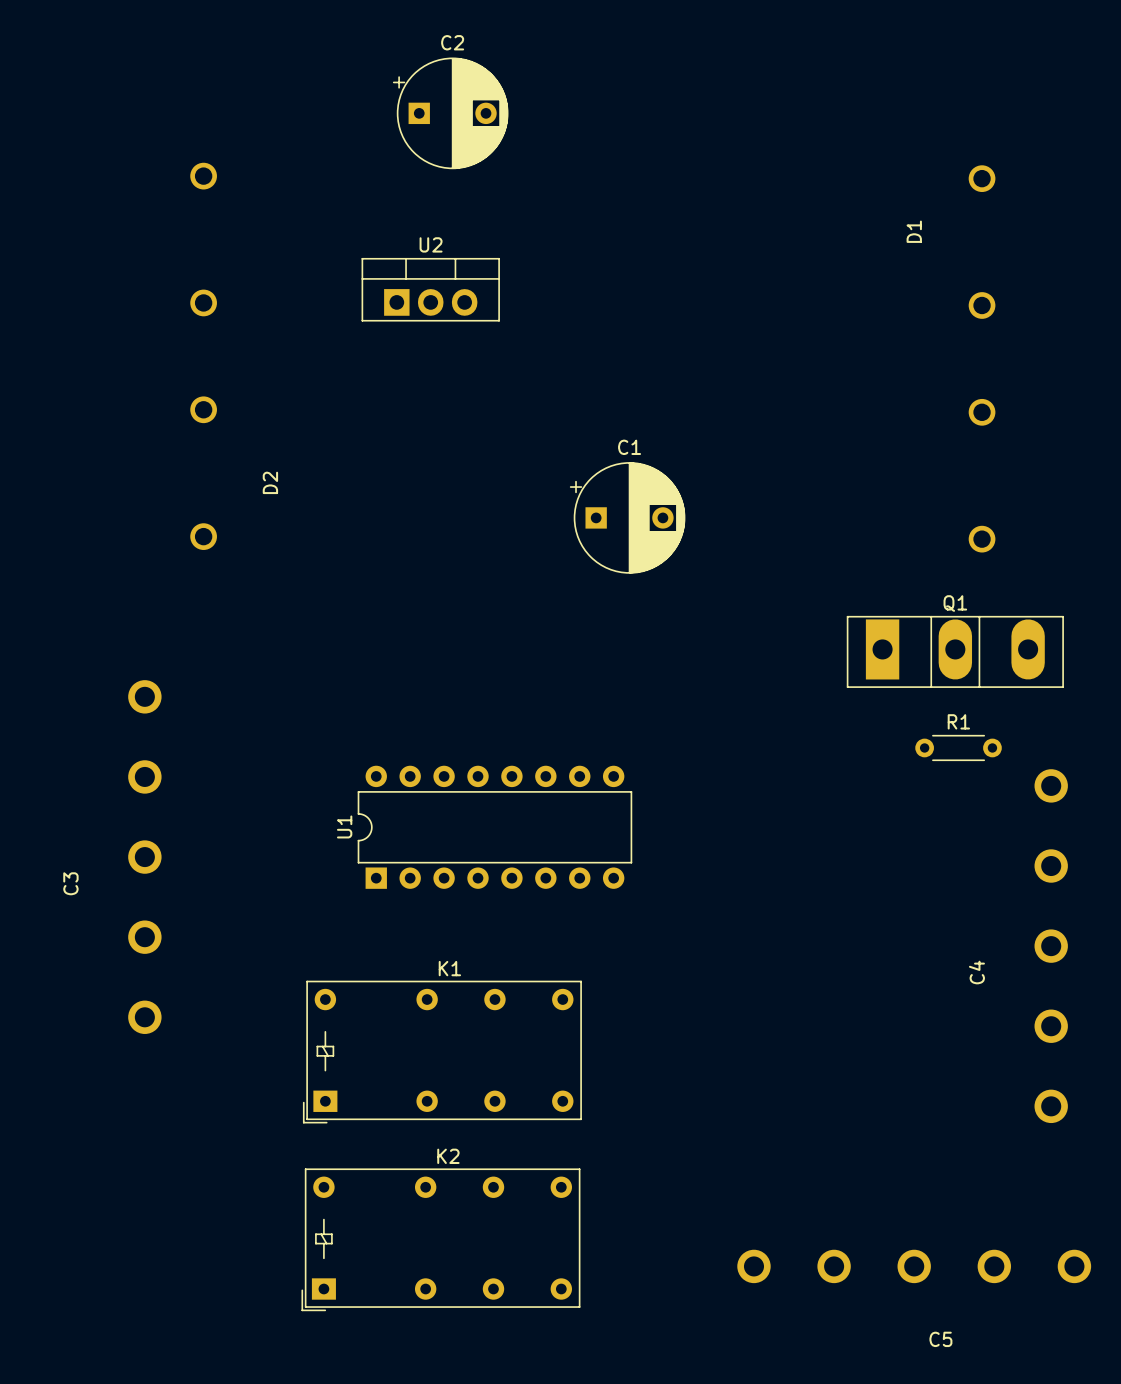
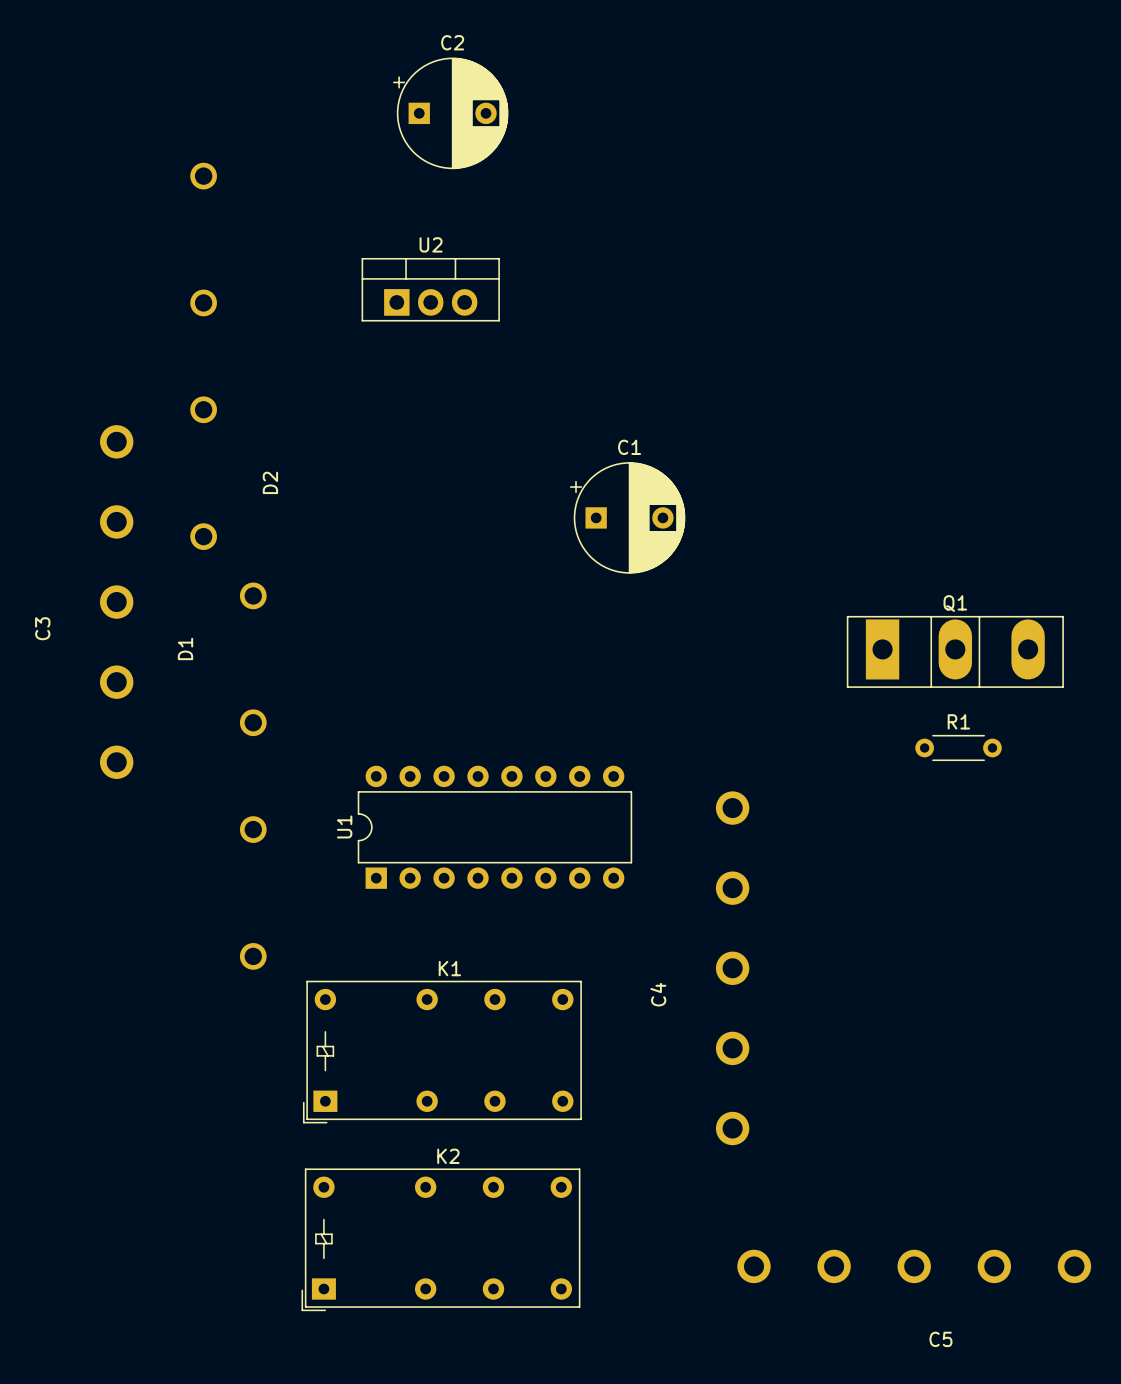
D1 position: (982, 358) -> (253, 776)
C3 position: (144, 857) -> (116, 602)
C4 position: (1051, 946) -> (732, 968)

